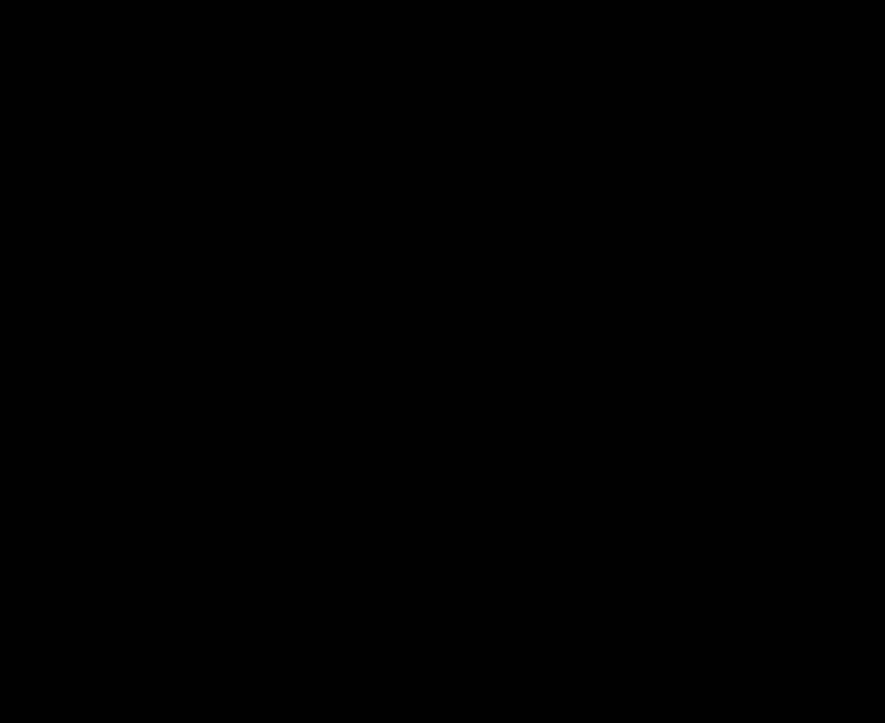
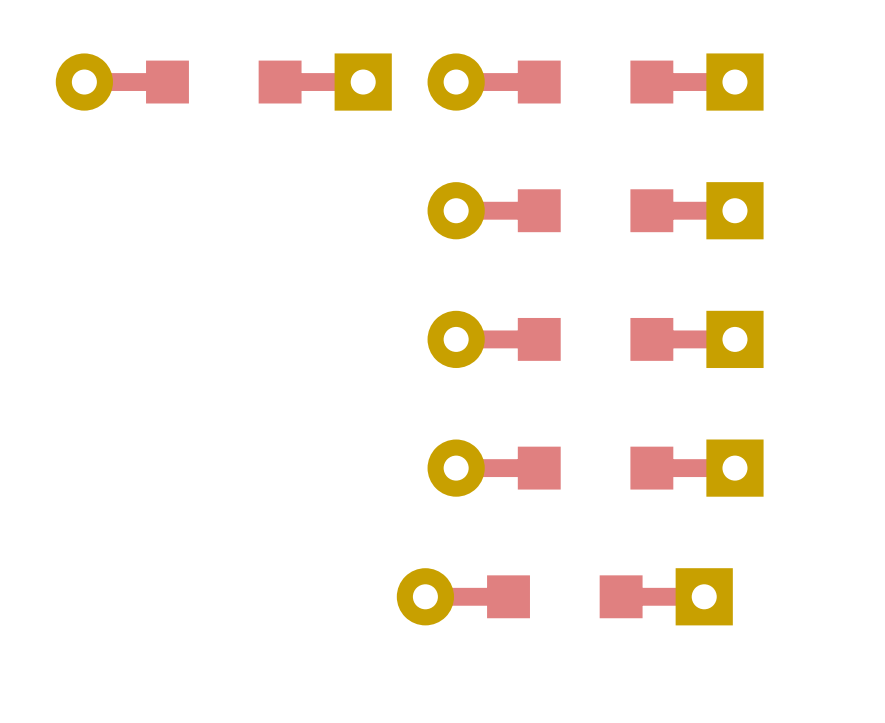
part: none -> (223, 82)
part: none -> (595, 82)
part: none -> (595, 210)
part: none -> (595, 339)
part: none -> (595, 468)
part: none -> (564, 596)

